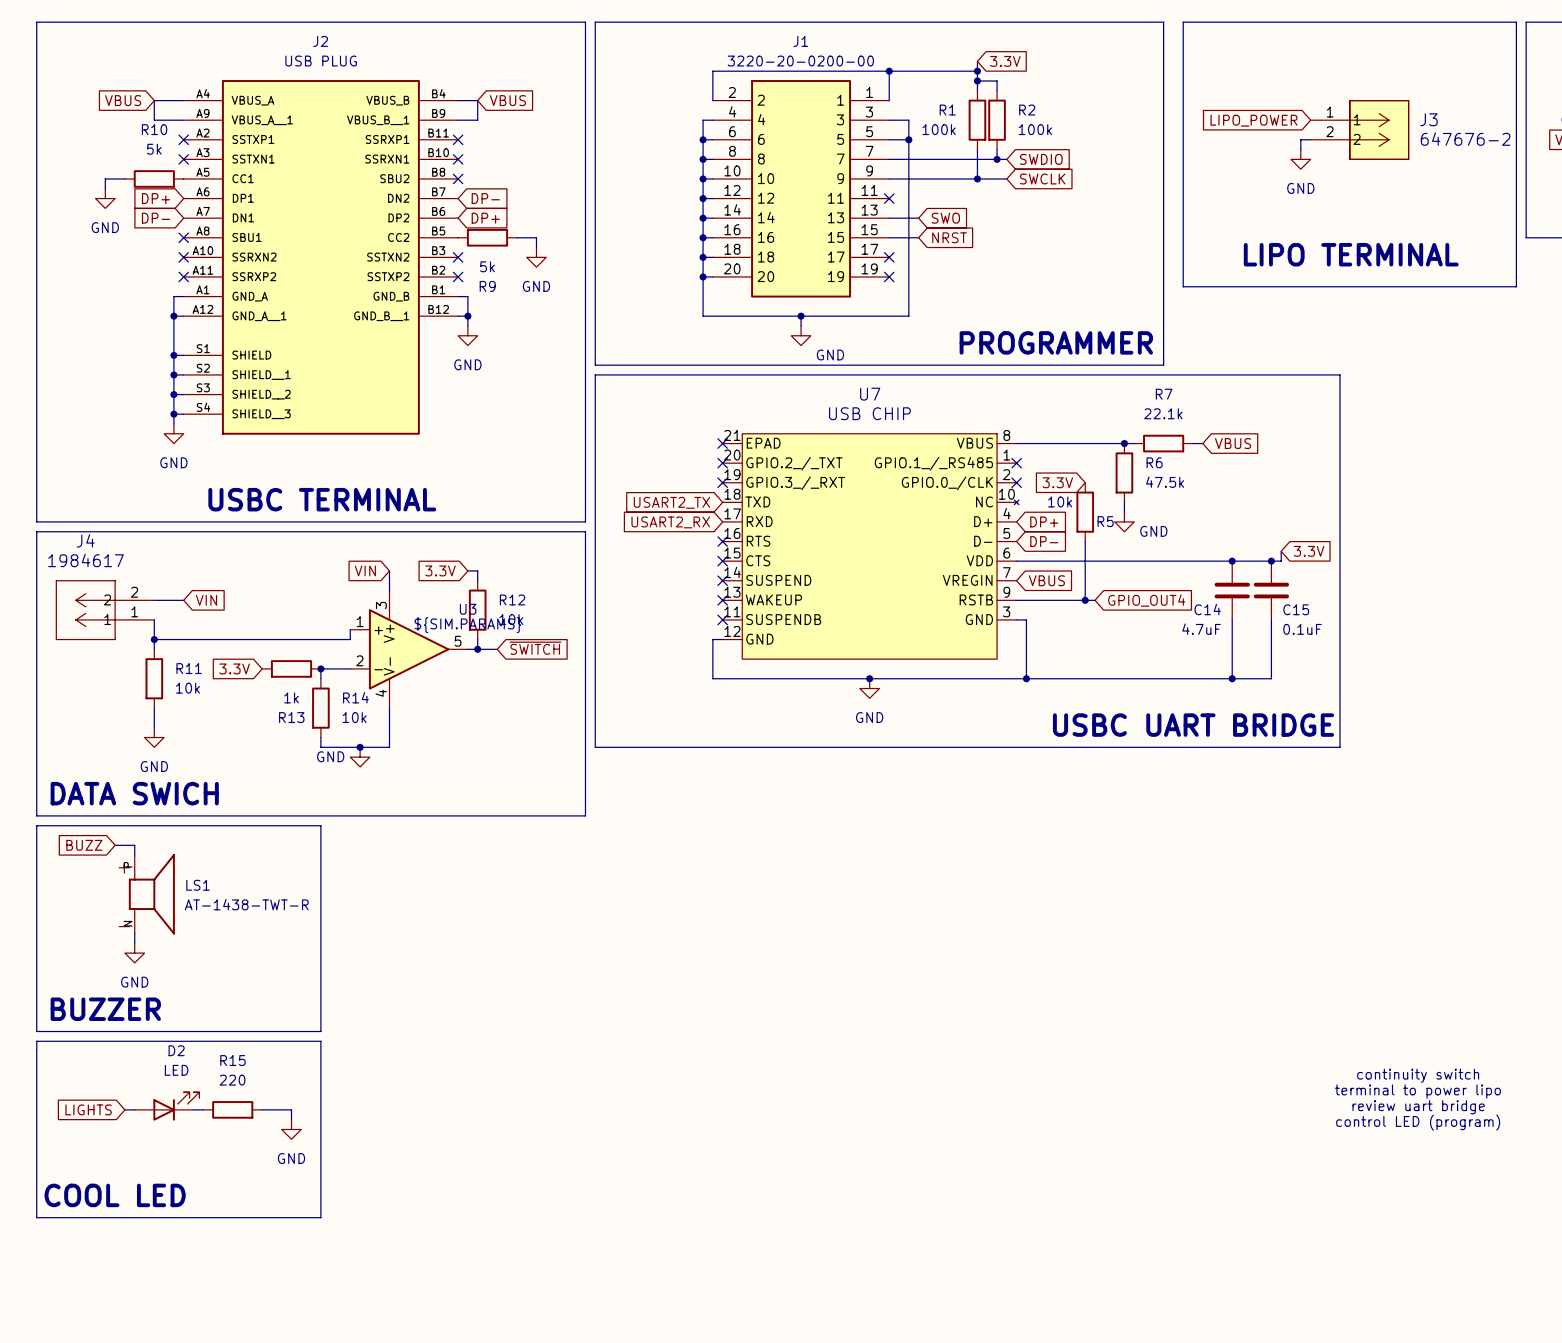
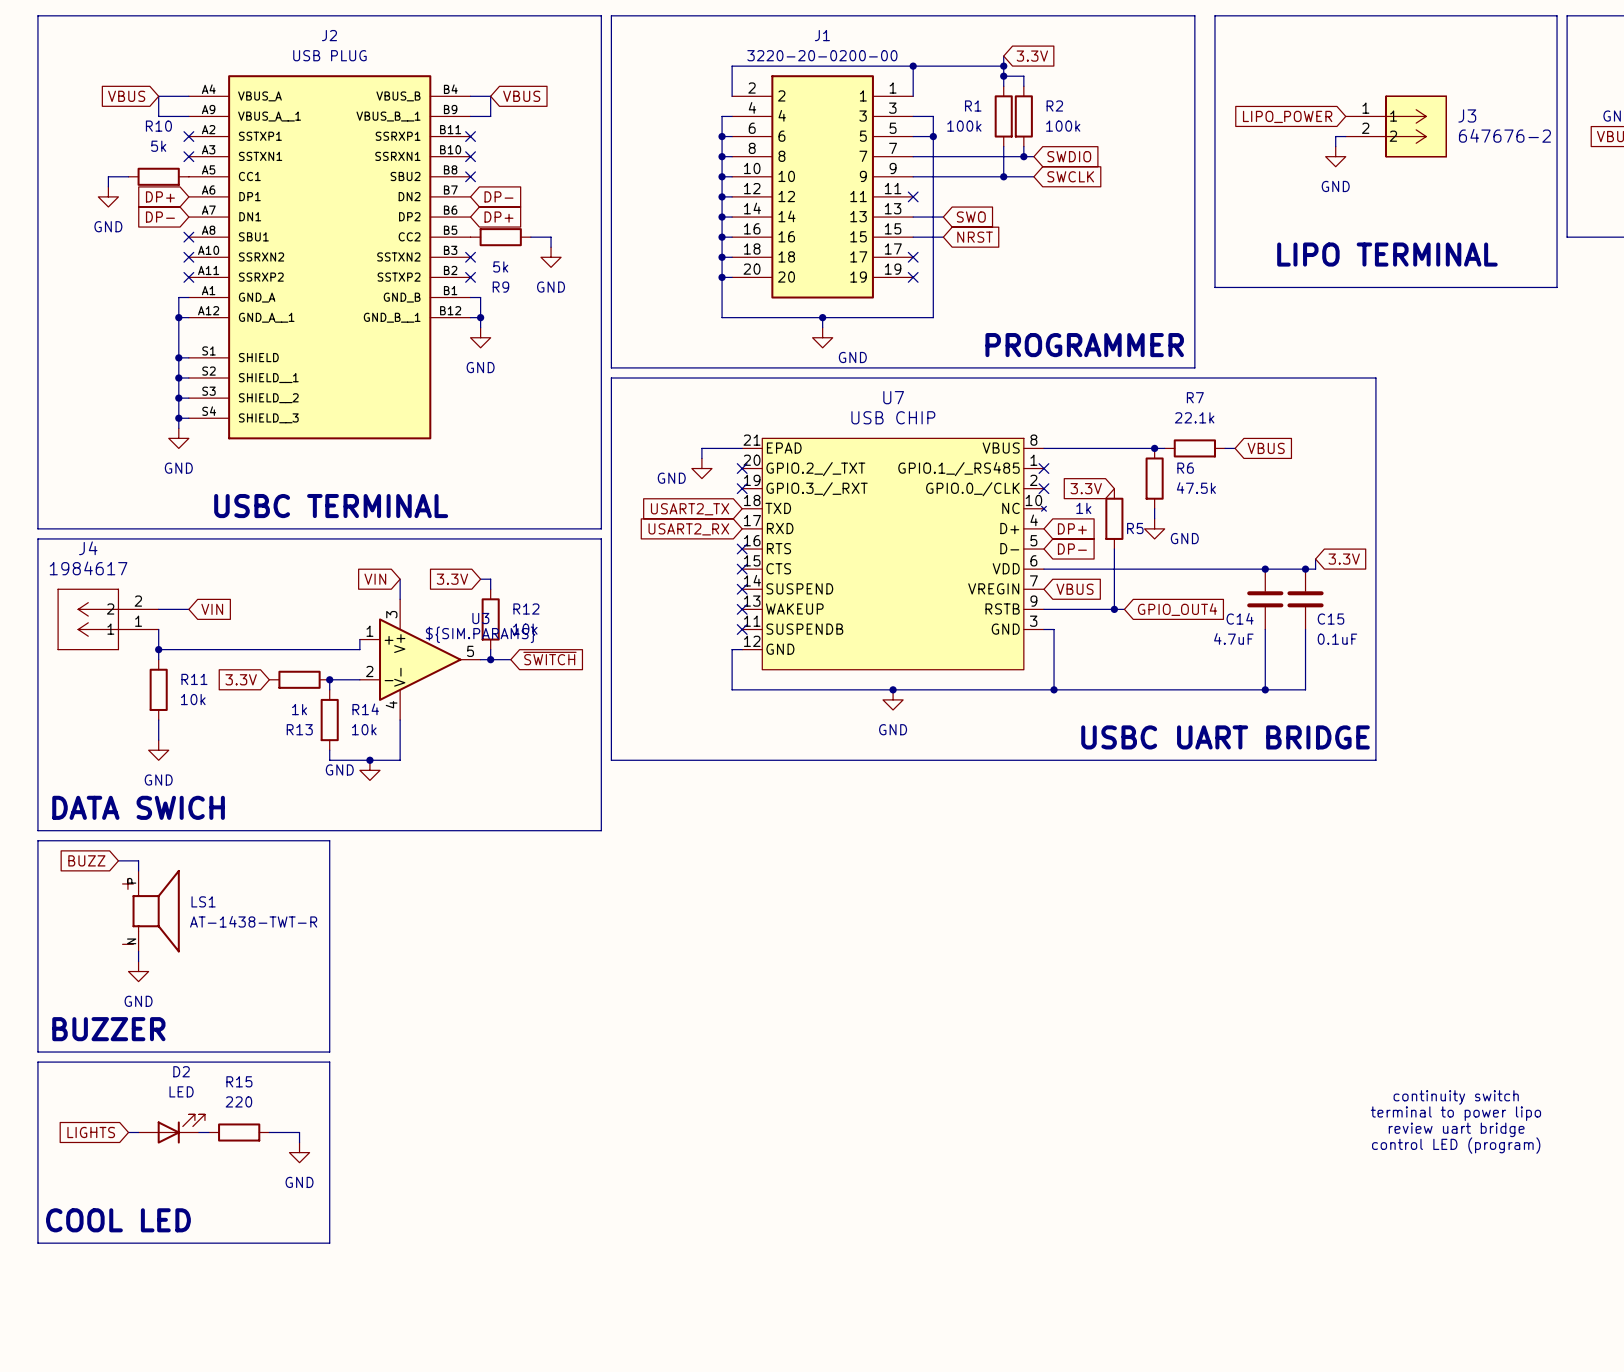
wire: none -> (742, 448) (701, 448) (701, 458)
no-connect mark: (722, 443) -> none
power symbol: none -> GND (701, 468)
R5 value: 10k (1060, 501) -> 1k (1083, 508)

